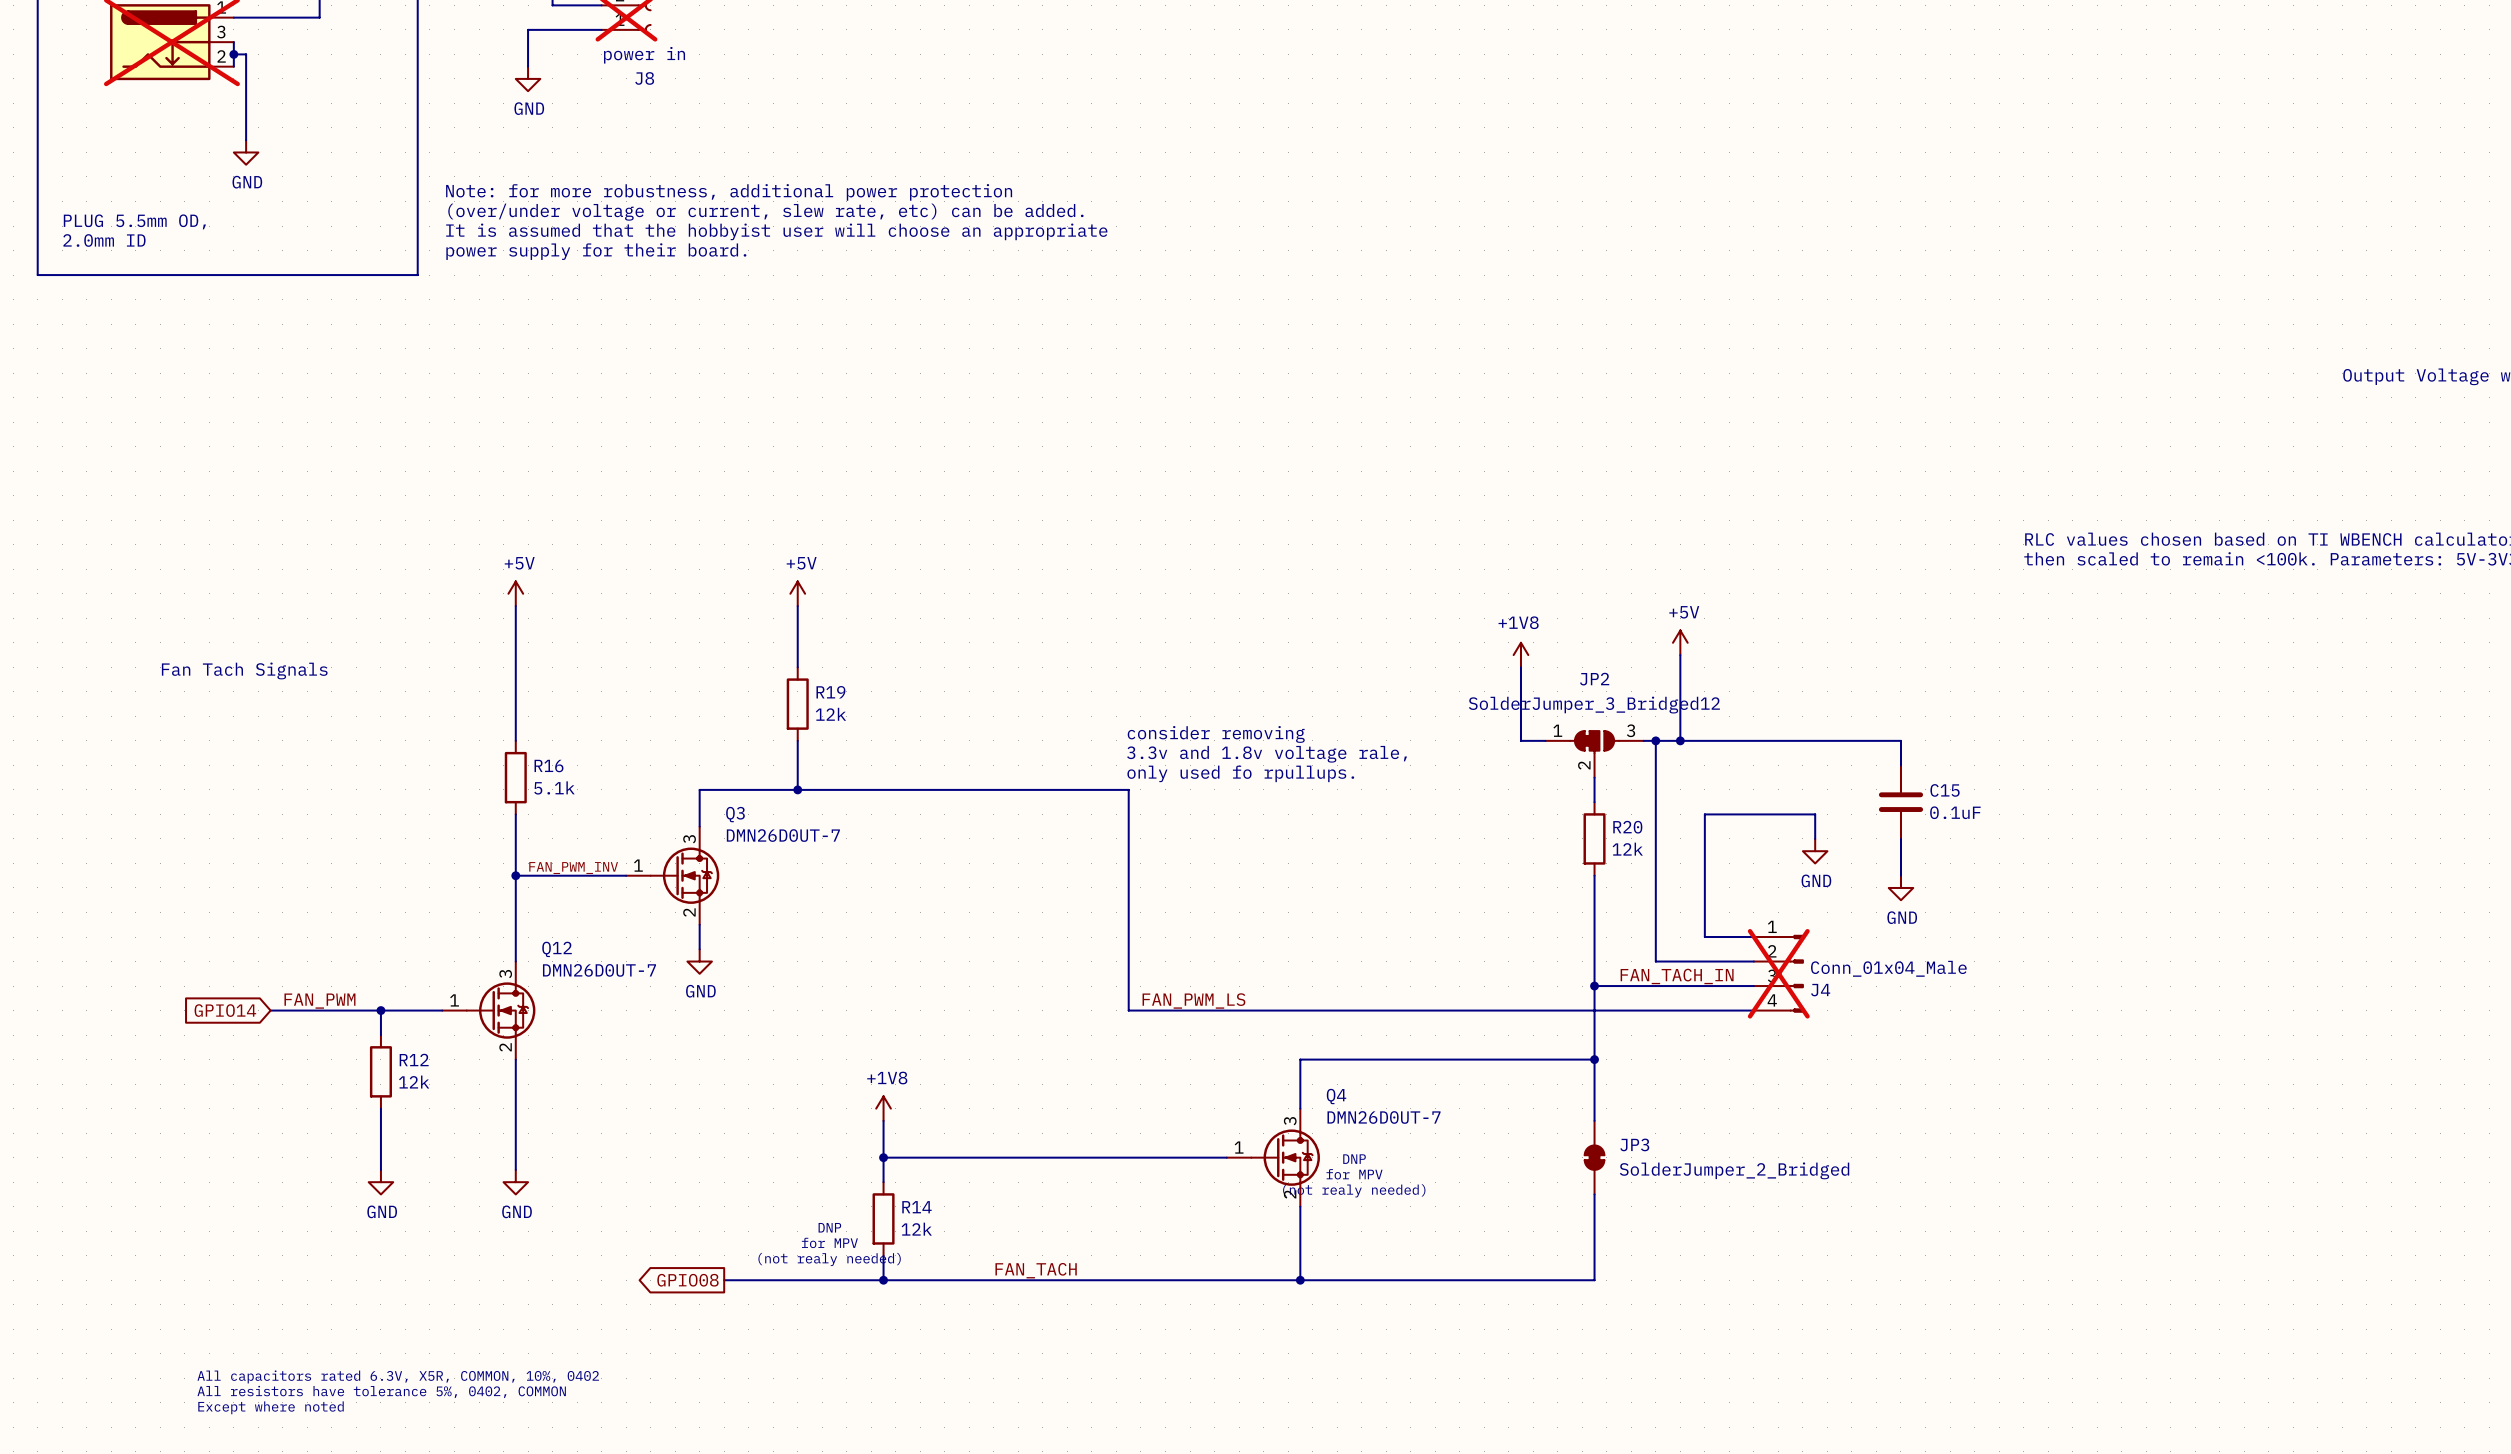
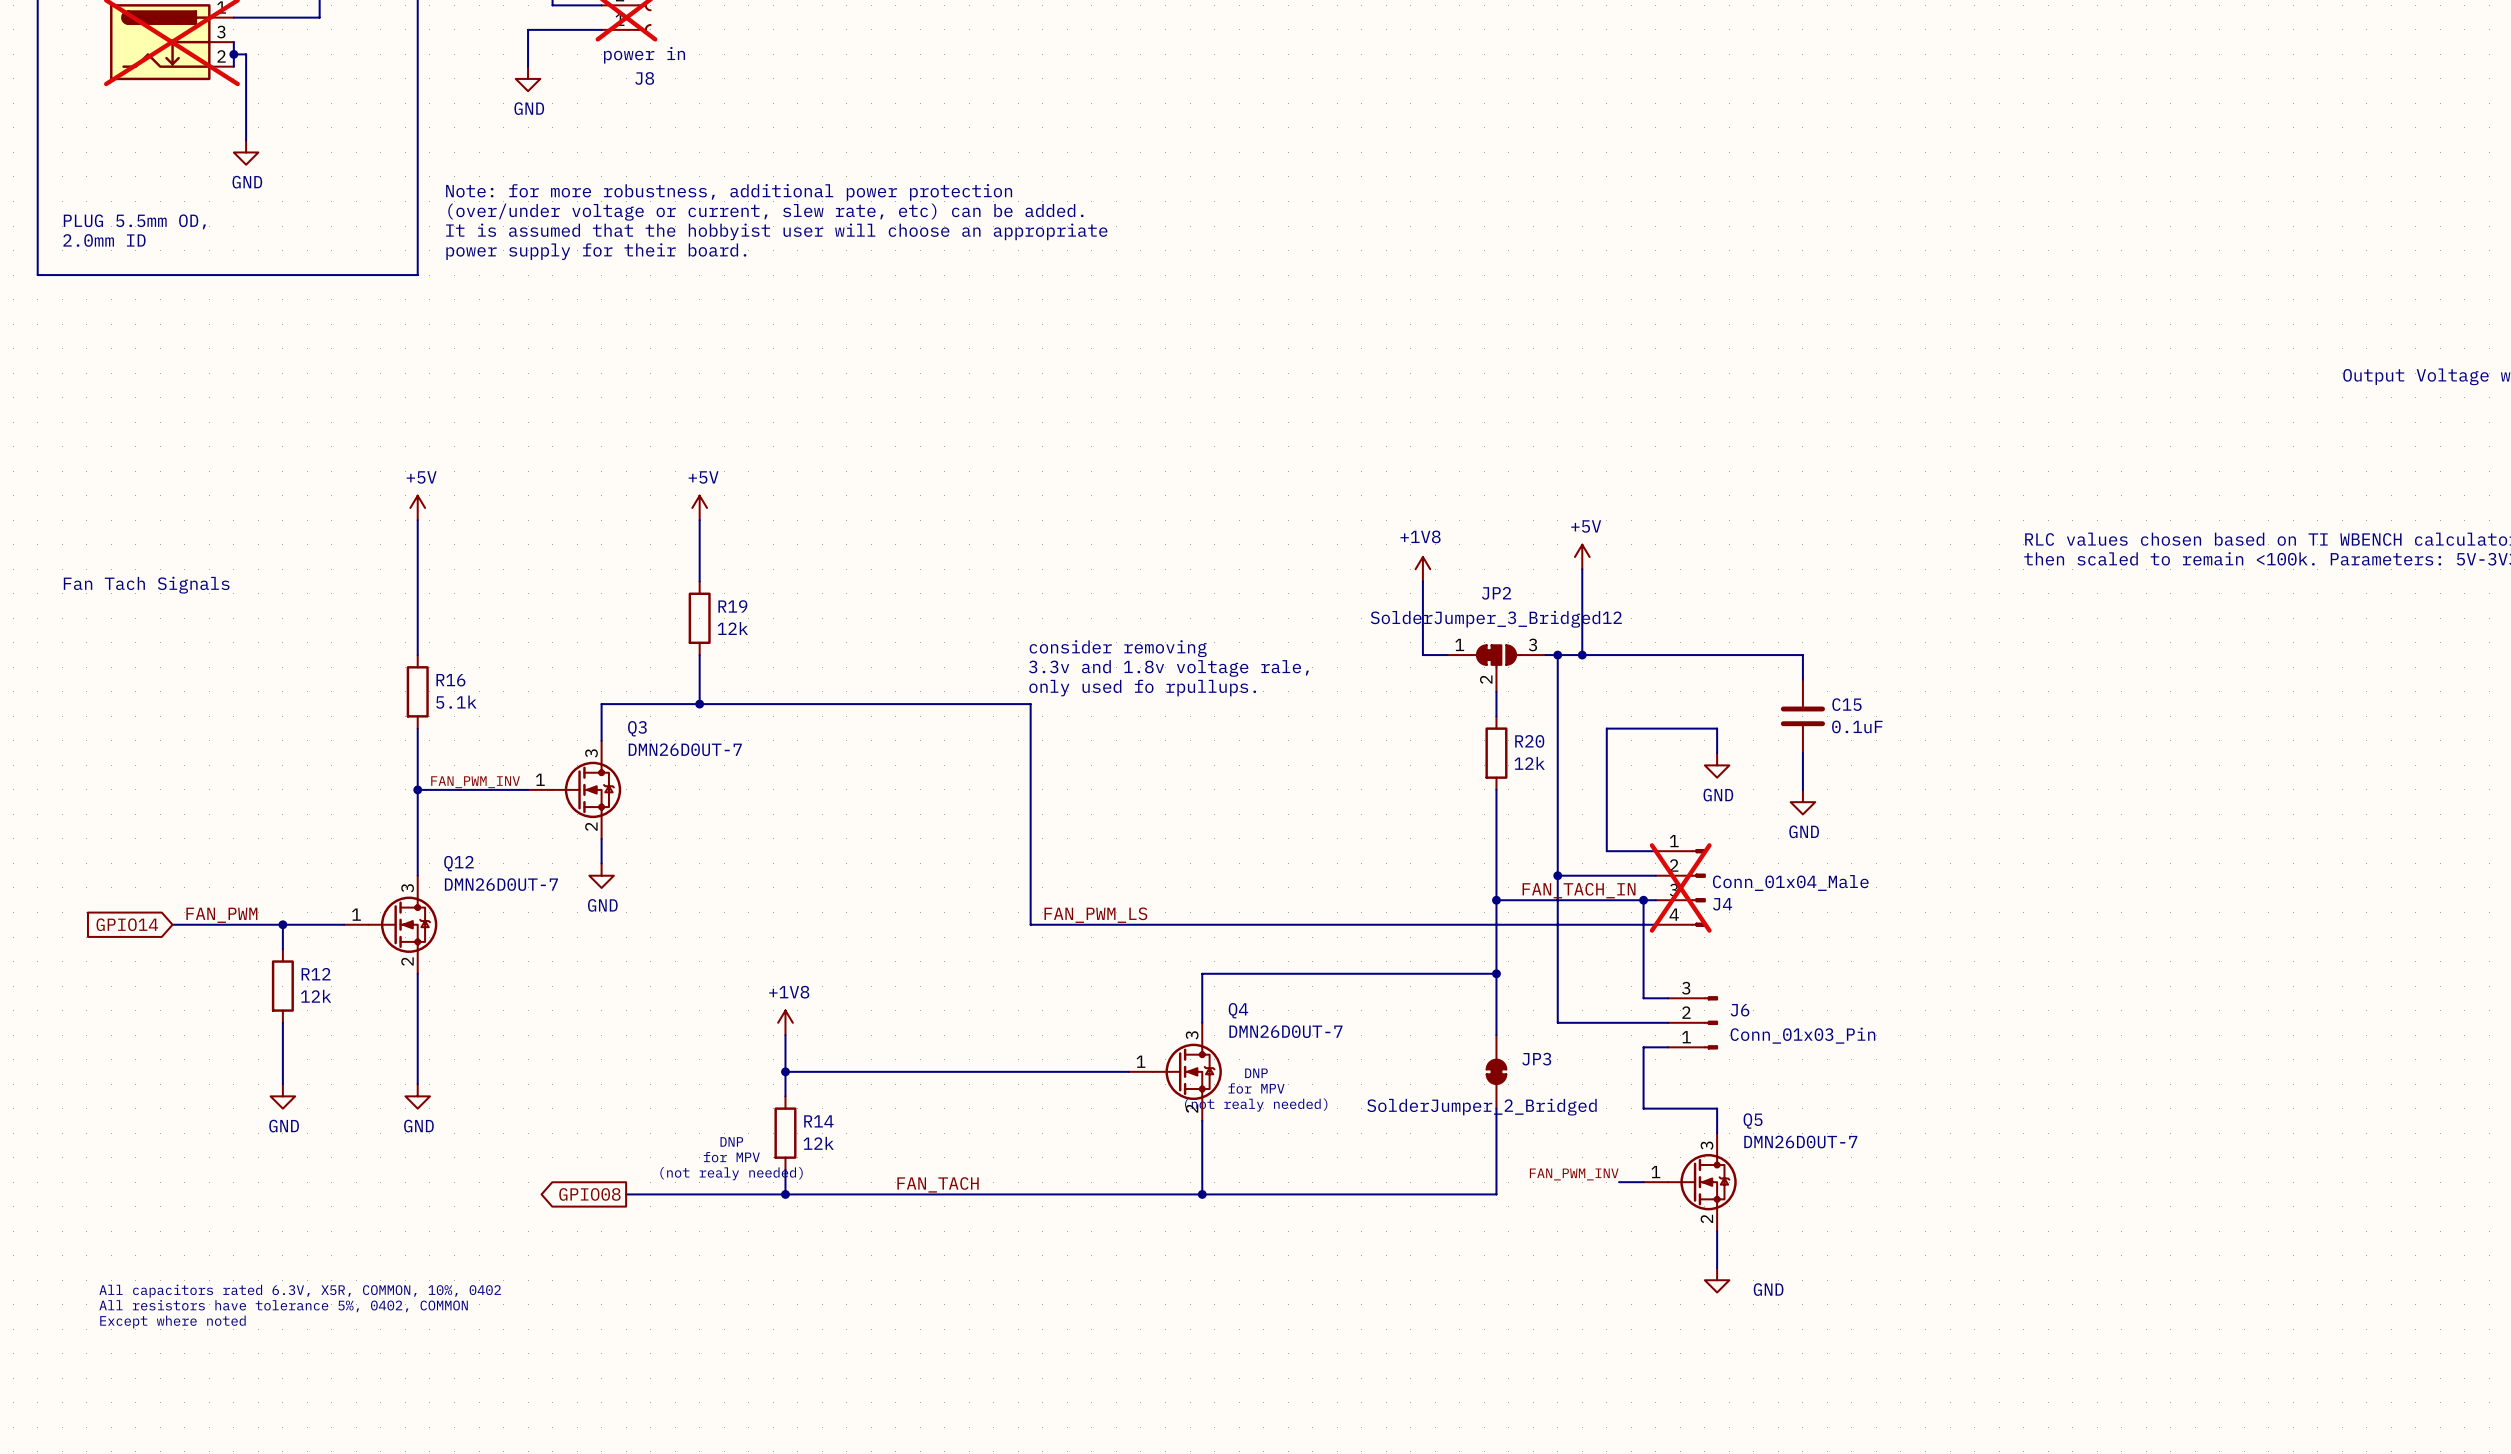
power symbol: none -> +5V (417, 507)
power symbol: none -> +5V (699, 507)
power symbol: +5V (515, 593) -> none
power symbol: +5V (797, 593) -> none
wire: (515, 606) (515, 740) -> (417, 520) (417, 655)
wire: (797, 606) (797, 667) -> (699, 520) (699, 581)
power symbol position: +5V (1680, 642) -> +5V (1582, 556)
power symbol position: +1V8 (1520, 655) -> +1V8 (1422, 569)
wire: none -> (1557, 655) (1557, 1022) (1668, 1022)
junction: none -> (1557, 655)
junction: none -> (1582, 655)
wire: (1680, 655) (1680, 740) -> (1582, 569) (1582, 655)
wire: (1520, 667) (1520, 740) (1545, 740) -> (1422, 581) (1422, 655) (1447, 655)
text position: Fan Tach Signals (244, 670) -> Fan Tach Signals (146, 585)
junction: none -> (699, 704)
R19 position: (797, 704) -> (699, 618)
text position: consider removing (1216, 734) -> consider removing (1118, 648)
wire: (797, 740) (797, 789) -> (699, 655) (699, 704)
wire: (1643, 740) (1900, 740) (1900, 765) -> (1545, 655) (1802, 655) (1802, 679)
wire: (1655, 740) (1655, 961) (1753, 961) -> none
junction: (1655, 740) -> none
junction: (1680, 740) -> none
text position: 3.3v and 1.8v voltage rale, (1267, 754) -> 3.3v and 1.8v voltage rale, (1169, 668)
JP2 position: (1594, 754) -> (1496, 668)
power symbol: none -> GND (1717, 765)
text position: only used fo rpullups. (1240, 773) -> only used fo rpullups. (1142, 688)
R16 position: (515, 777) -> (417, 691)
wire: (1594, 777) (1594, 802) -> (1496, 691) (1496, 716)
junction: none -> (417, 789)
junction: (797, 789) -> none
C15 position: (1900, 802) -> (1802, 716)
wire: (515, 814) (515, 961) -> (417, 728) (417, 875)
wire: (699, 826) (699, 789) (1128, 789) (1128, 1010) (1753, 1010) -> (601, 740) (601, 704) (1030, 704) (1030, 924) (1655, 924)
R20 position: (1594, 838) -> (1496, 753)
wire: (1815, 838) (1815, 814) (1704, 814) (1704, 937) (1753, 937) -> (1717, 753) (1717, 728) (1606, 728) (1606, 851) (1655, 851)
wire: (1900, 838) (1900, 875) -> (1802, 753) (1802, 789)
power symbol position: GND (1815, 851) -> GND (1802, 802)
label position: FAN_PWM_INV (573, 868) -> FAN_PWM_INV (475, 782)
wire: (515, 875) (626, 875) -> (417, 789) (528, 789)
junction: (515, 875) -> none
Q3 position: (672, 875) -> (574, 789)
wire: none -> (1557, 875) (1655, 875)
junction: none -> (1557, 875)
wire: (1594, 875) (1594, 1120) -> (1496, 789) (1496, 1035)
power symbol: GND (1900, 887) -> none
junction: none -> (1496, 900)
wire: none -> (1643, 900) (1643, 998) (1668, 998)
junction: none -> (1643, 900)
junction: none -> (282, 924)
wire: (699, 924) (699, 949) -> (601, 838) (601, 863)
power symbol position: GND (699, 961) -> GND (601, 875)
junction: none -> (1496, 973)
J4 position: (1778, 973) -> (1680, 887)
label position: FAN_TACH_IN (1677, 976) -> FAN_TACH_IN (1579, 890)
wire: (1594, 986) (1753, 986) -> (1496, 900) (1655, 900)
junction: (1594, 986) -> none
label position: FAN_PWM (319, 1001) -> FAN_PWM (221, 915)
label position: FAN_PWM_LS (1193, 1001) -> FAN_PWM_LS (1095, 915)
global label position: GPIO14 (225, 1010) -> GPIO14 (127, 924)
wire: (270, 1010) (442, 1010) -> (172, 924) (344, 924)
wire: (380, 1010) (380, 1035) -> (282, 924) (282, 949)
junction: (380, 1010) -> none
Q12 position: (488, 1010) -> (390, 924)
J6: none -> Conn_01x03_Pin (1692, 1022)
wire: none -> (1668, 1047) (1643, 1047) (1643, 1108) (1717, 1108) (1717, 1133)
wire: (515, 1059) (515, 1169) -> (417, 973) (417, 1084)
wire: (1594, 1059) (1300, 1059) (1300, 1108) -> (1496, 973) (1202, 973) (1202, 1022)
junction: (1594, 1059) -> none
R12 position: (380, 1071) -> (282, 986)
junction: none -> (785, 1071)
power symbol: none -> GND (282, 1096)
power symbol: none -> GND (417, 1096)
wire: (380, 1108) (380, 1169) -> (282, 1022) (282, 1084)
power symbol position: +1V8 (883, 1108) -> +1V8 (785, 1022)
wire: (883, 1120) (883, 1182) -> (785, 1035) (785, 1096)
wire: (883, 1157) (1226, 1157) -> (785, 1071) (1128, 1071)
junction: (883, 1157) -> none
Q4 position: (1273, 1157) -> (1175, 1071)
JP3 position: (1594, 1157) -> (1496, 1071)
text position: DNP (1354, 1159) -> DNP (1256, 1073)
JP3 value position: SolderJumper_2_Bridged (1734, 1170) -> SolderJumper_2_Bridged (1482, 1107)
text position: for MPV (1354, 1174) -> for MPV (1256, 1088)
label: none -> FAN_PWM_INV (1574, 1174)
power symbol: GND (380, 1182) -> none
power symbol: GND (515, 1182) -> none
wire: none -> (1619, 1182) (1643, 1182)
Q5: none -> DMN26D0UT-7 (1690, 1182)
text position: (not realy needed) (1354, 1190) -> (not realy needed) (1256, 1105)
junction: none -> (785, 1194)
junction: none -> (1202, 1194)
wire: (1594, 1194) (1594, 1280) (724, 1280) -> (1496, 1108) (1496, 1194) (626, 1194)
wire: (1300, 1206) (1300, 1280) -> (1202, 1120) (1202, 1194)
R14 position: (883, 1218) -> (785, 1133)
text position: DNP (829, 1227) -> DNP (731, 1141)
wire: none -> (1717, 1231) (1717, 1267)
text position: for MPV (829, 1242) -> for MPV (731, 1157)
wire: (883, 1255) (883, 1280) -> (785, 1169) (785, 1194)
text position: (not realy needed) (829, 1259) -> (not realy needed) (731, 1173)
label position: FAN_TACH (1036, 1270) -> FAN_TACH (938, 1184)
global label position: GPIO08 (687, 1280) -> GPIO08 (589, 1194)
junction: (883, 1280) -> none
junction: (1300, 1280) -> none
power symbol: none -> GND (1717, 1280)
text position: All capacitors rated 6.3V, X5R, COMMON, 10%, 0402 (398, 1376) -> All capacitors rated 6.3V, X5R, COMMON, 10%, 0402 (300, 1291)
text position: All resistors have tolerance 5%, 0402, COMMON (381, 1391) -> All resistors have tolerance 5%, 0402, COMMON (283, 1306)
text position: Except where noted (271, 1407) -> Except where noted (172, 1321)

